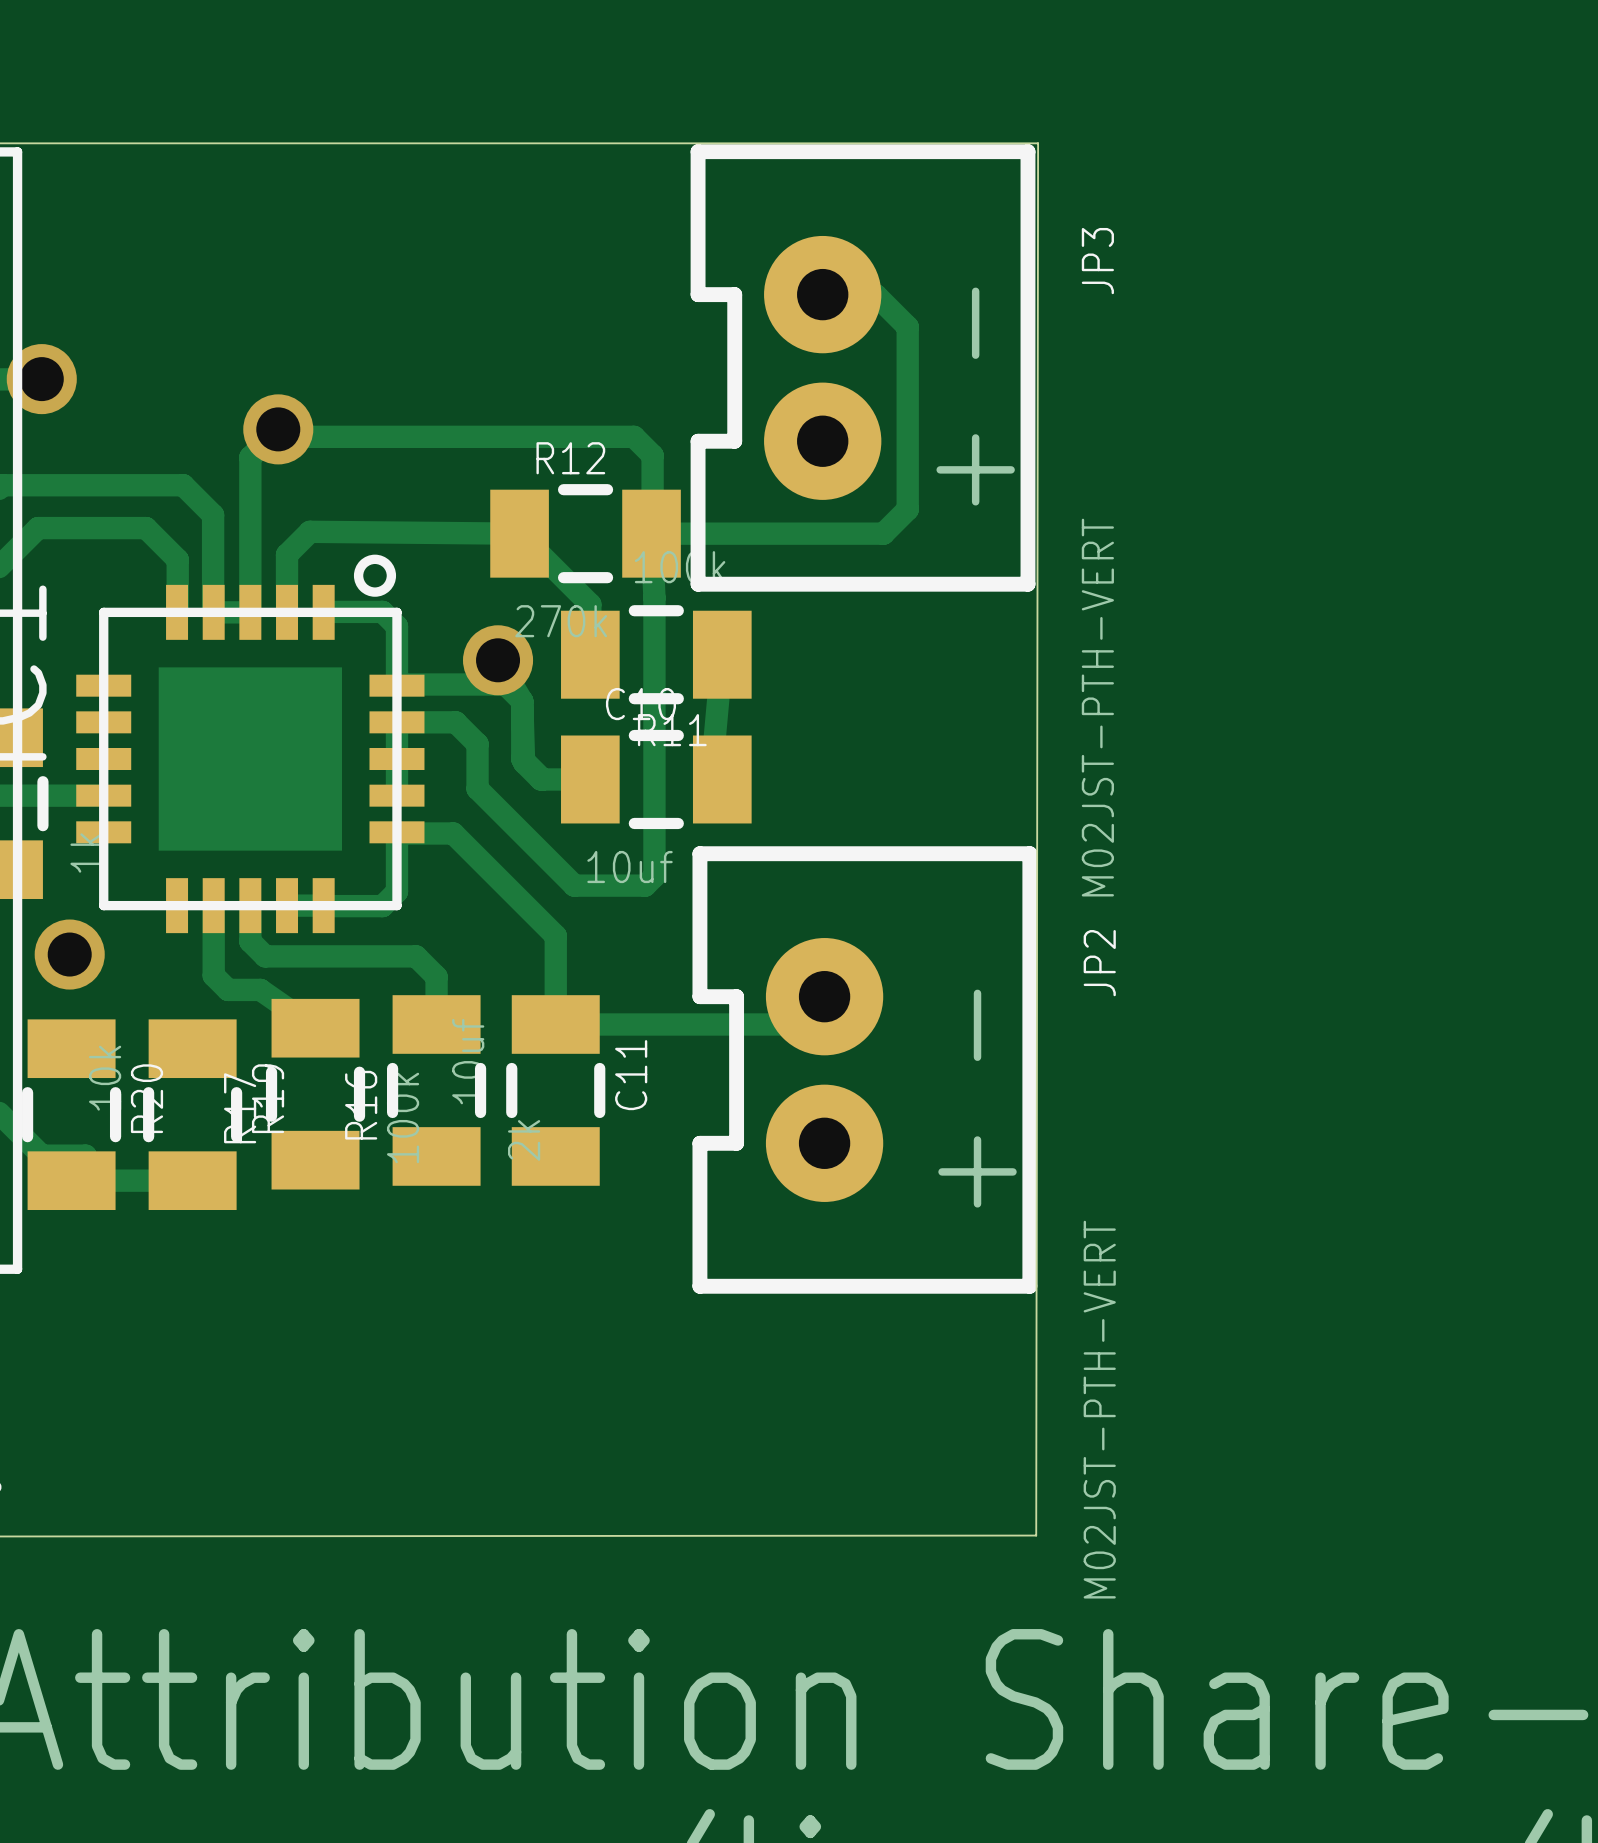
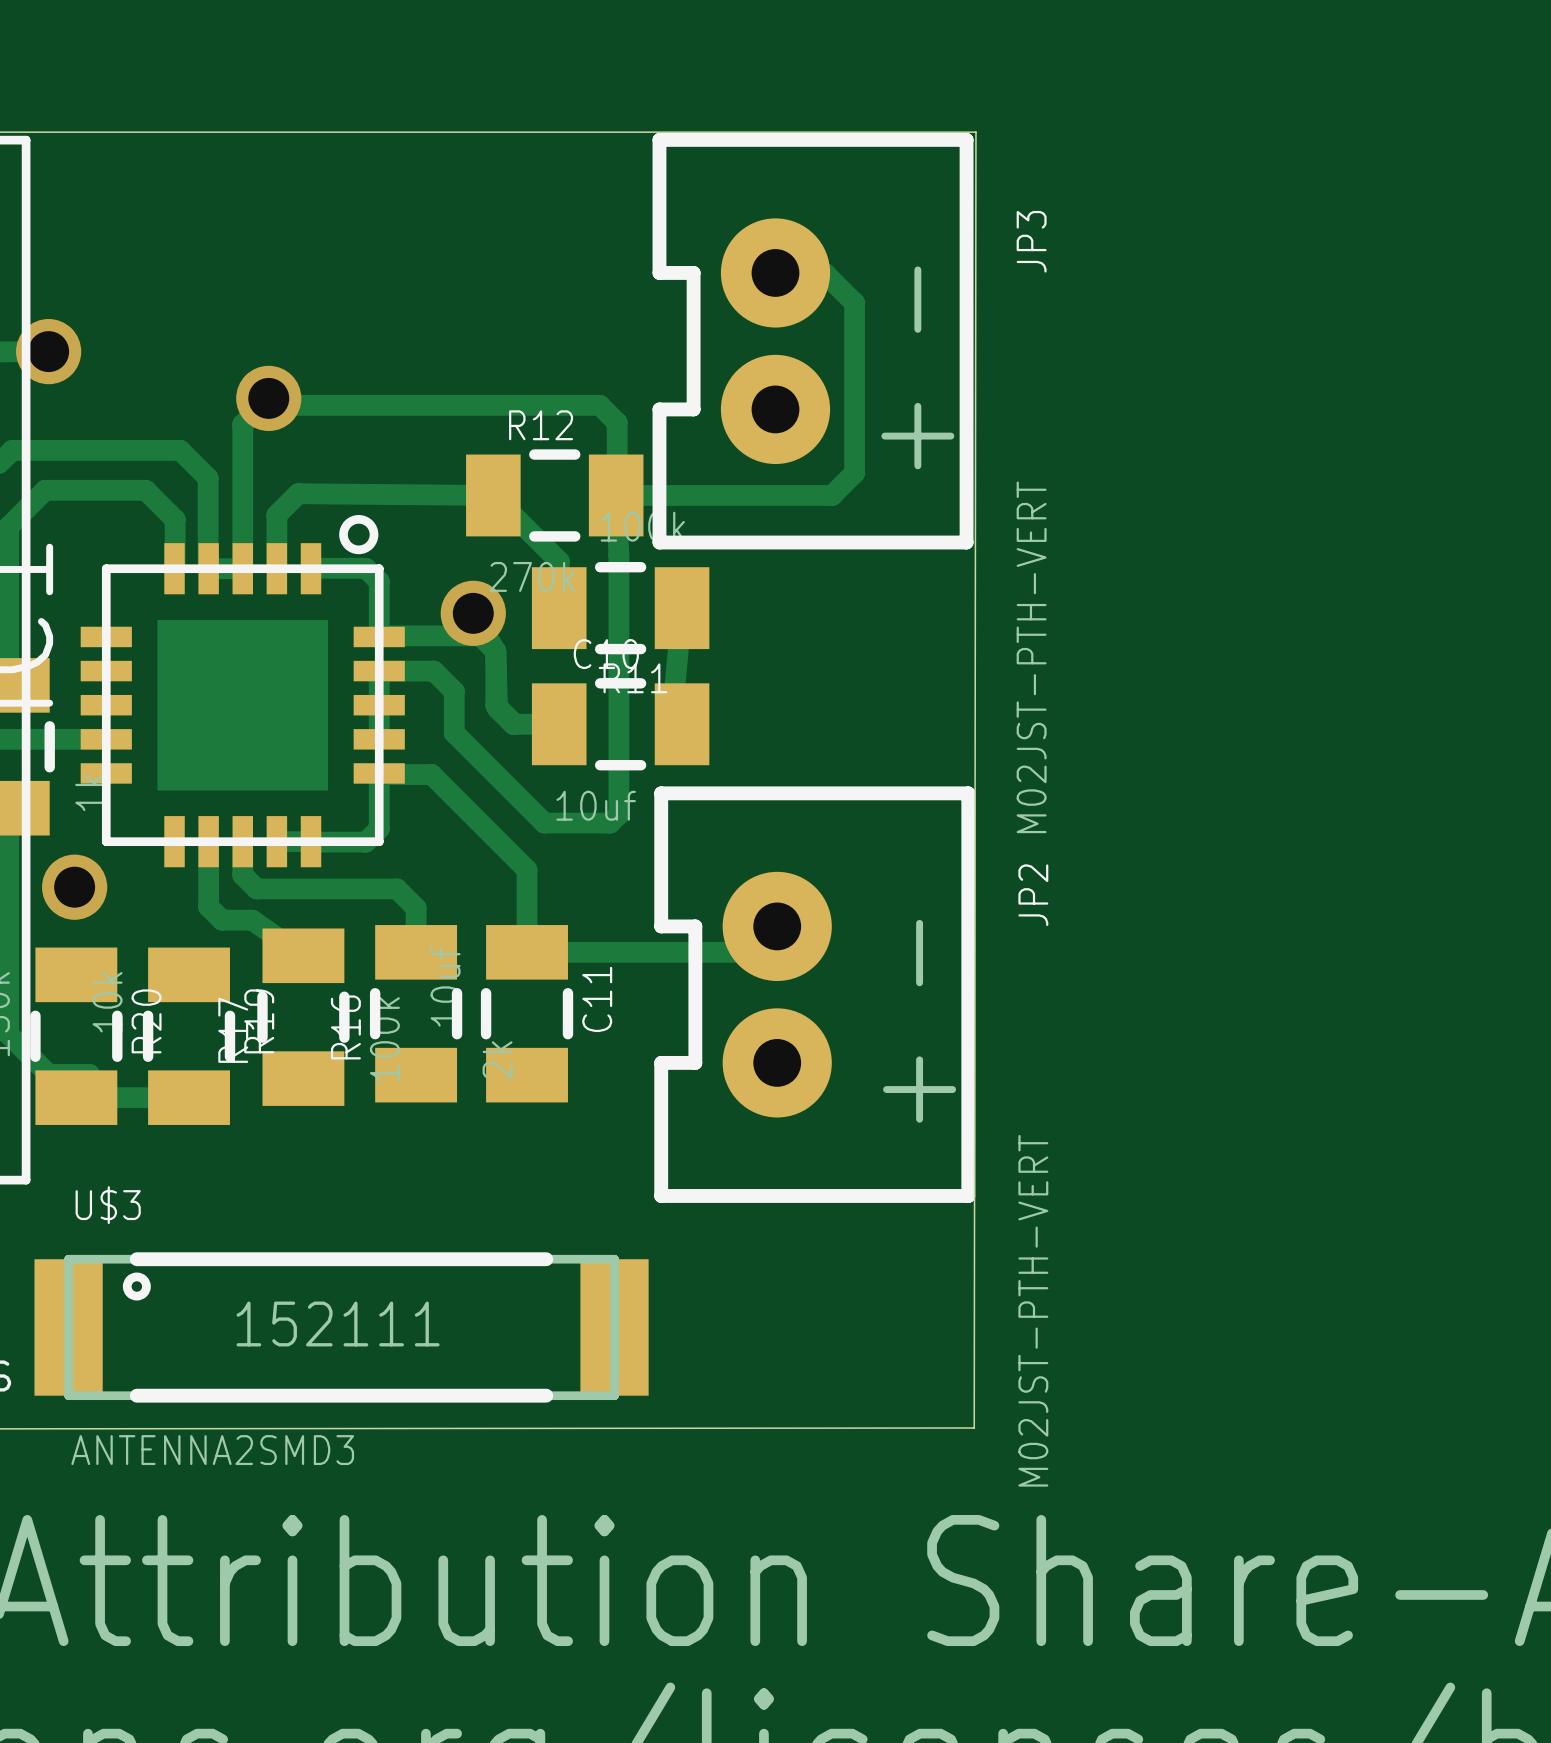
U$3: none -> ANTENNA2SMD3 (341, 1327)

